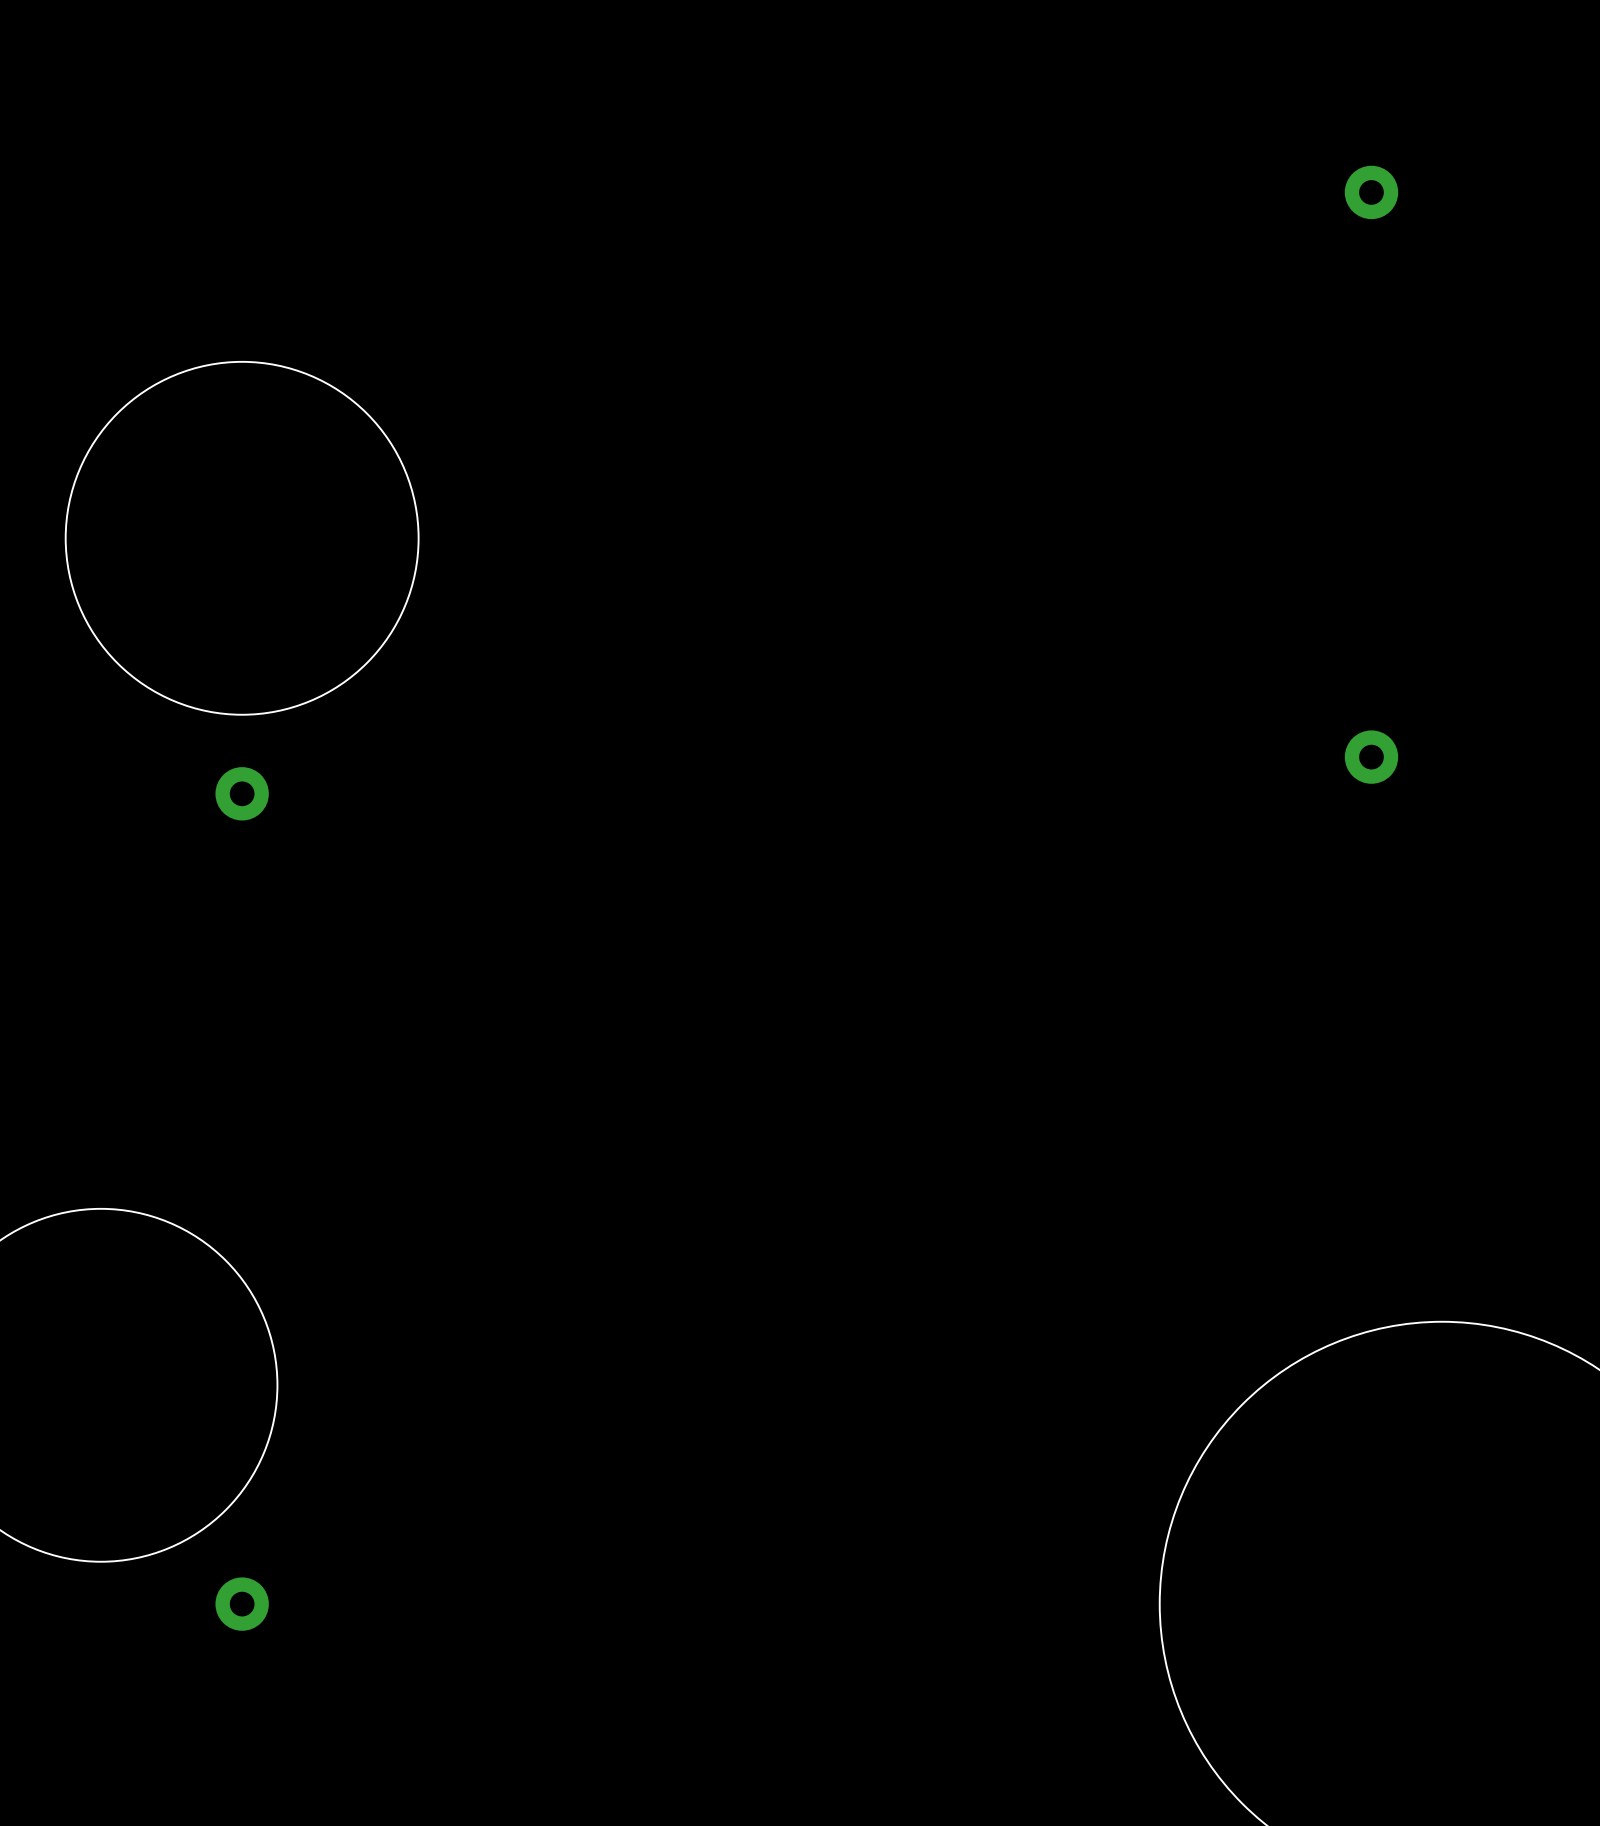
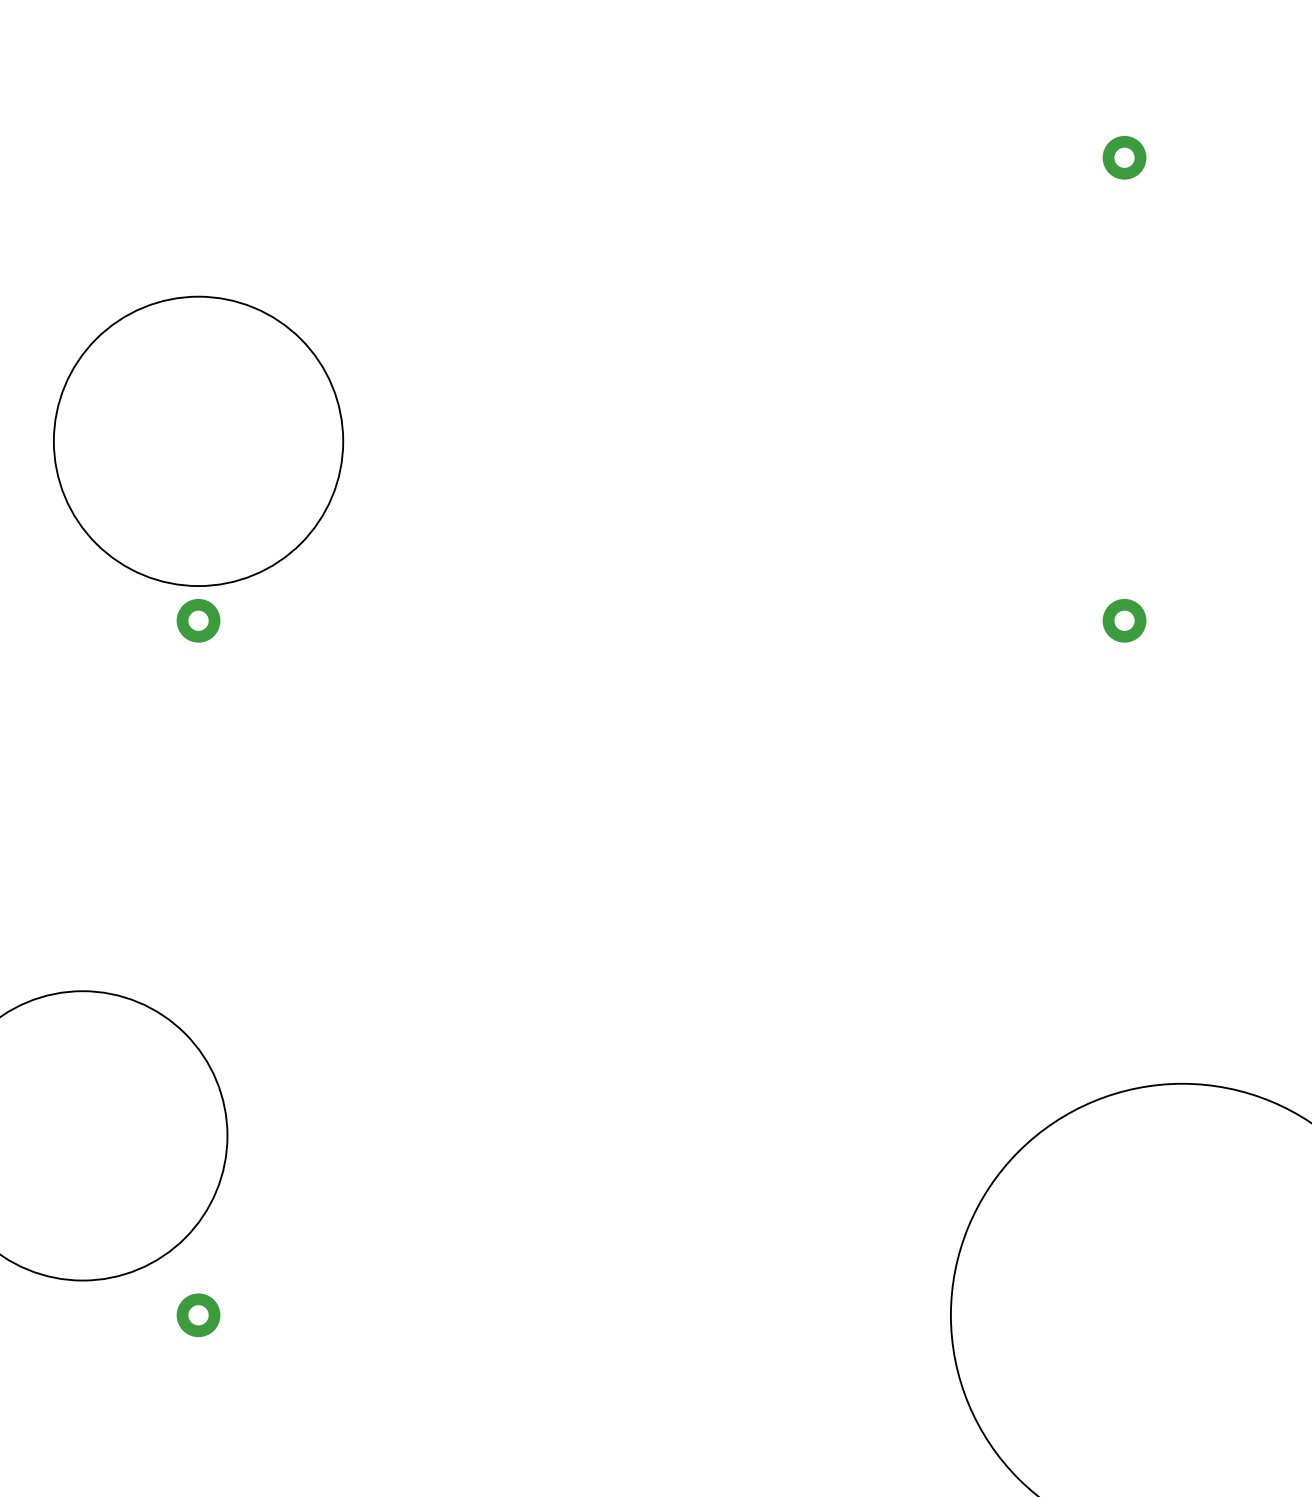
via position: (242, 793) -> (198, 620)

